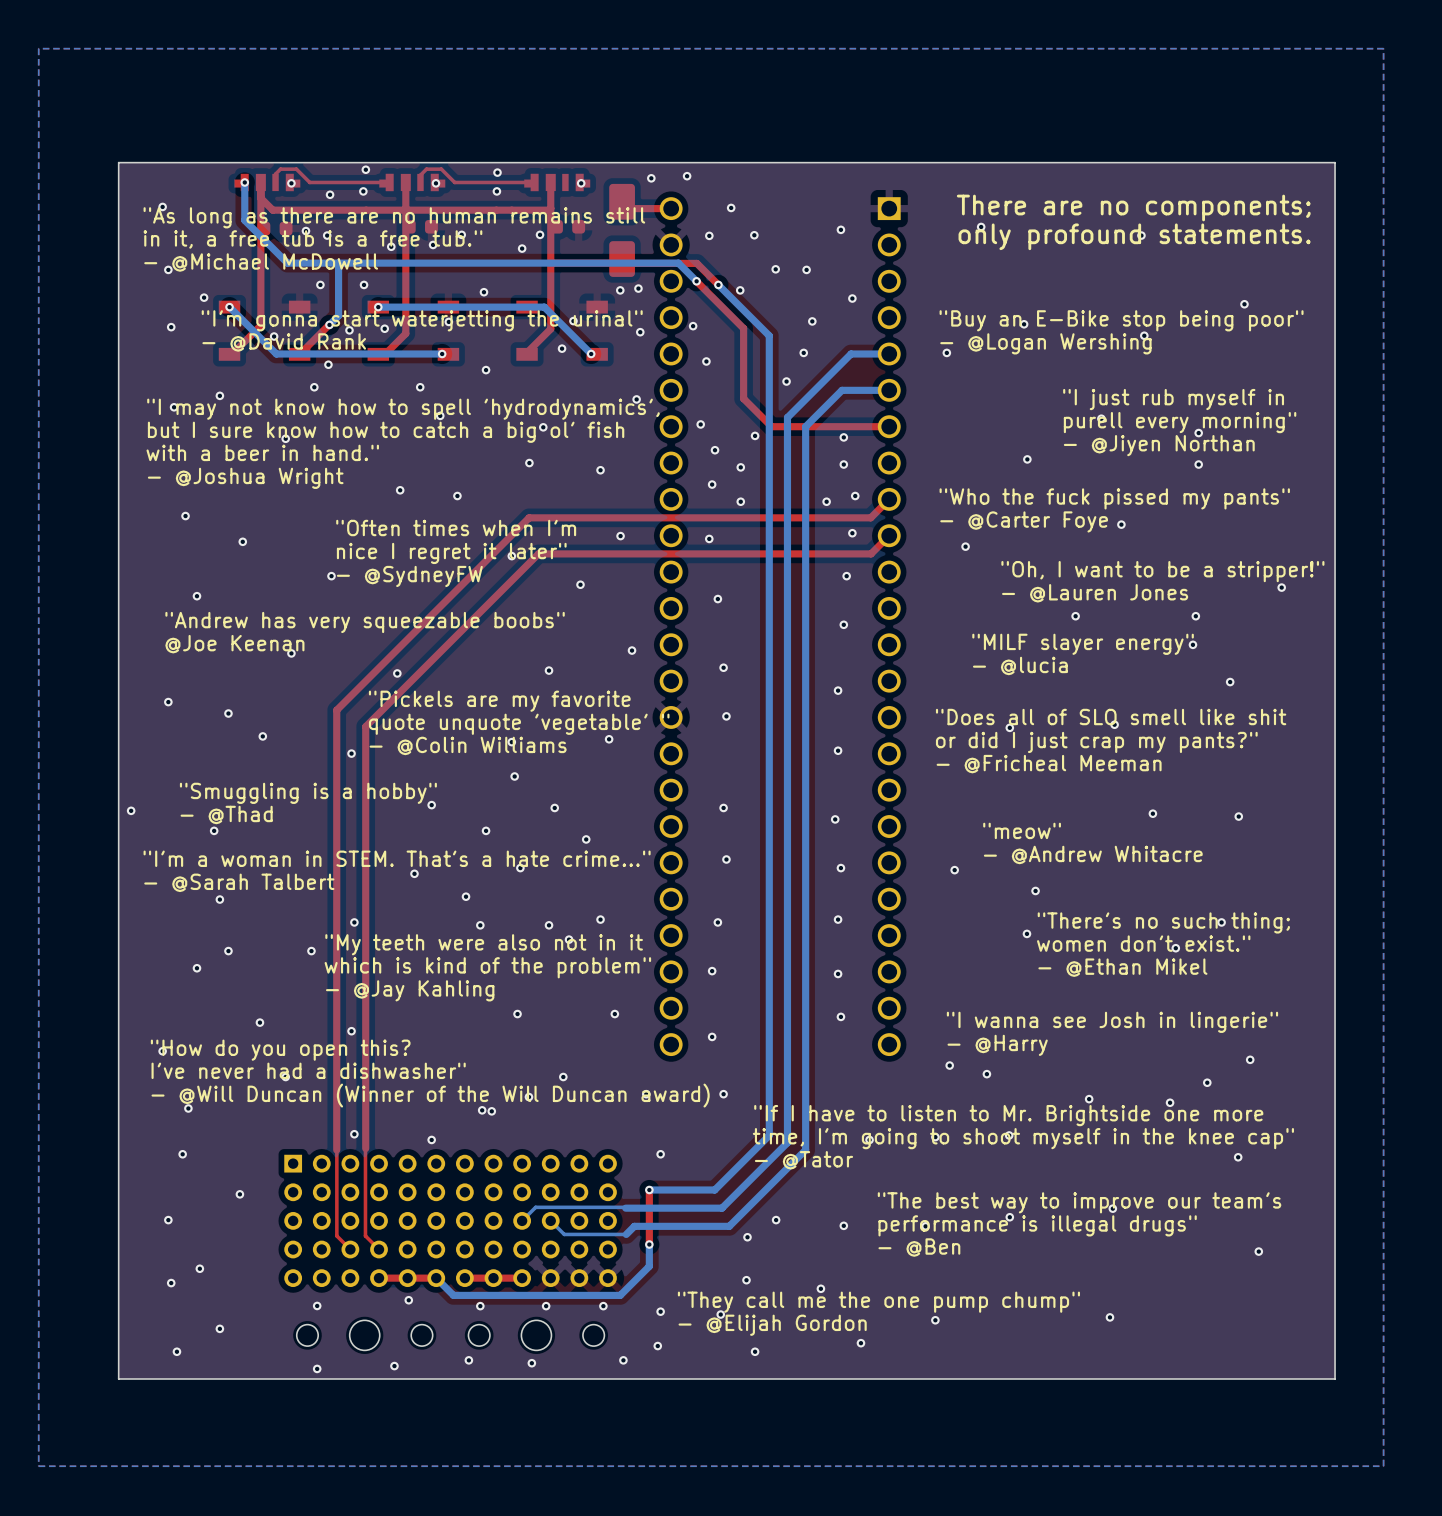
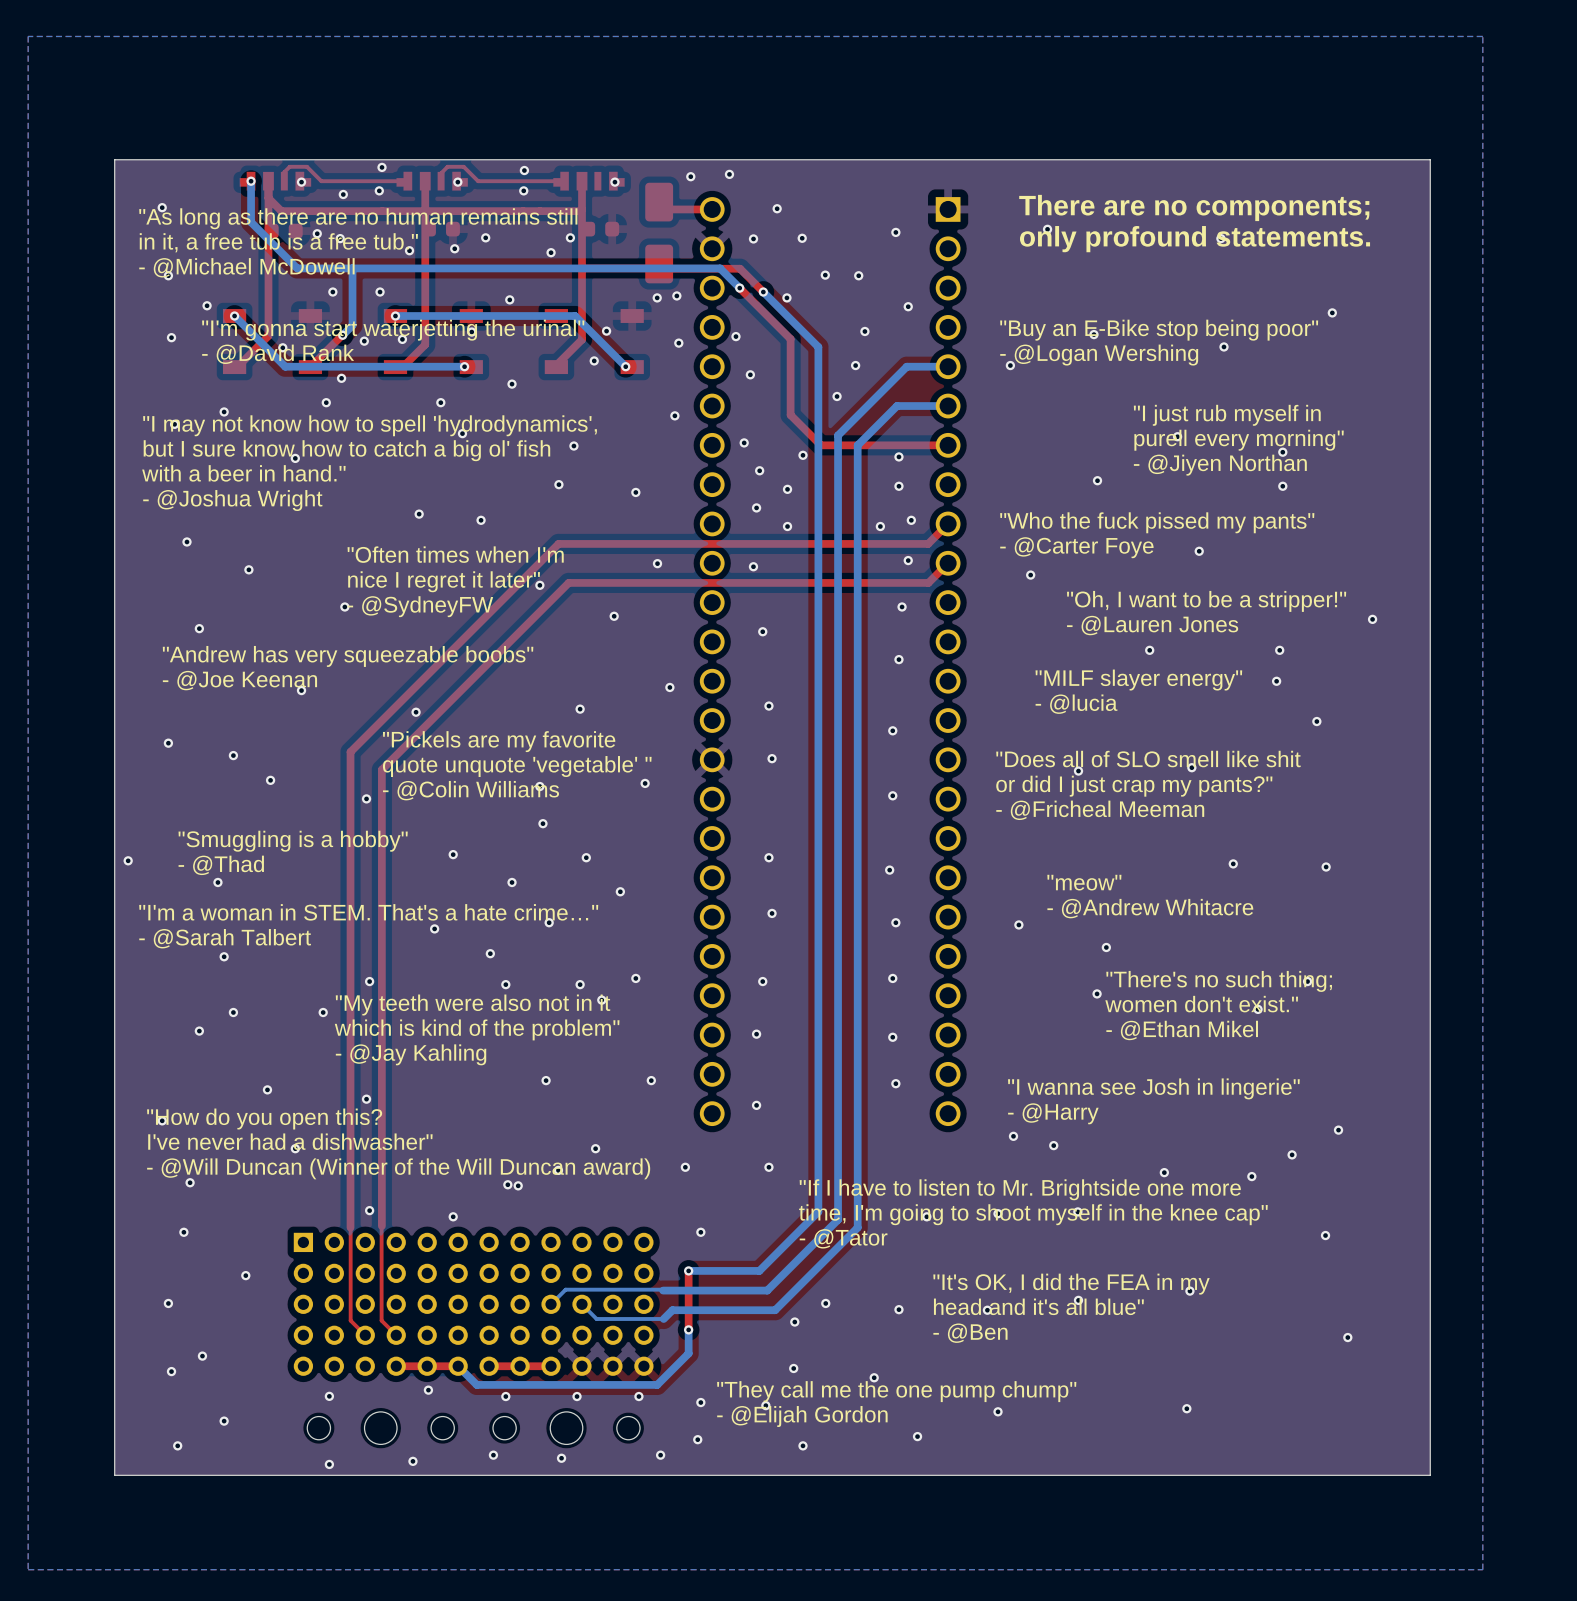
text: @Joe Keenan (234, 644) -> - @Joe Keenan (239, 680)
text: "The best way to improve our team's (1079, 1202) -> "It's OK, I did the FEA in my (1071, 1284)
text: performance is illegal drugs" (1037, 1225) -> head and it's all blue" (1038, 1306)

